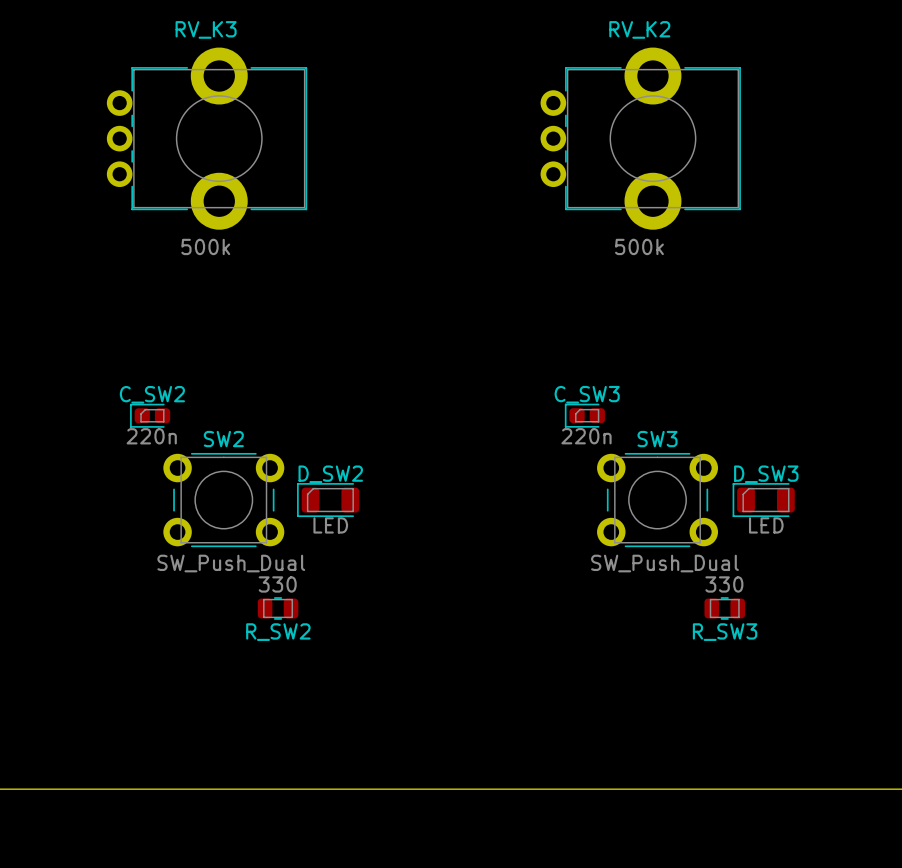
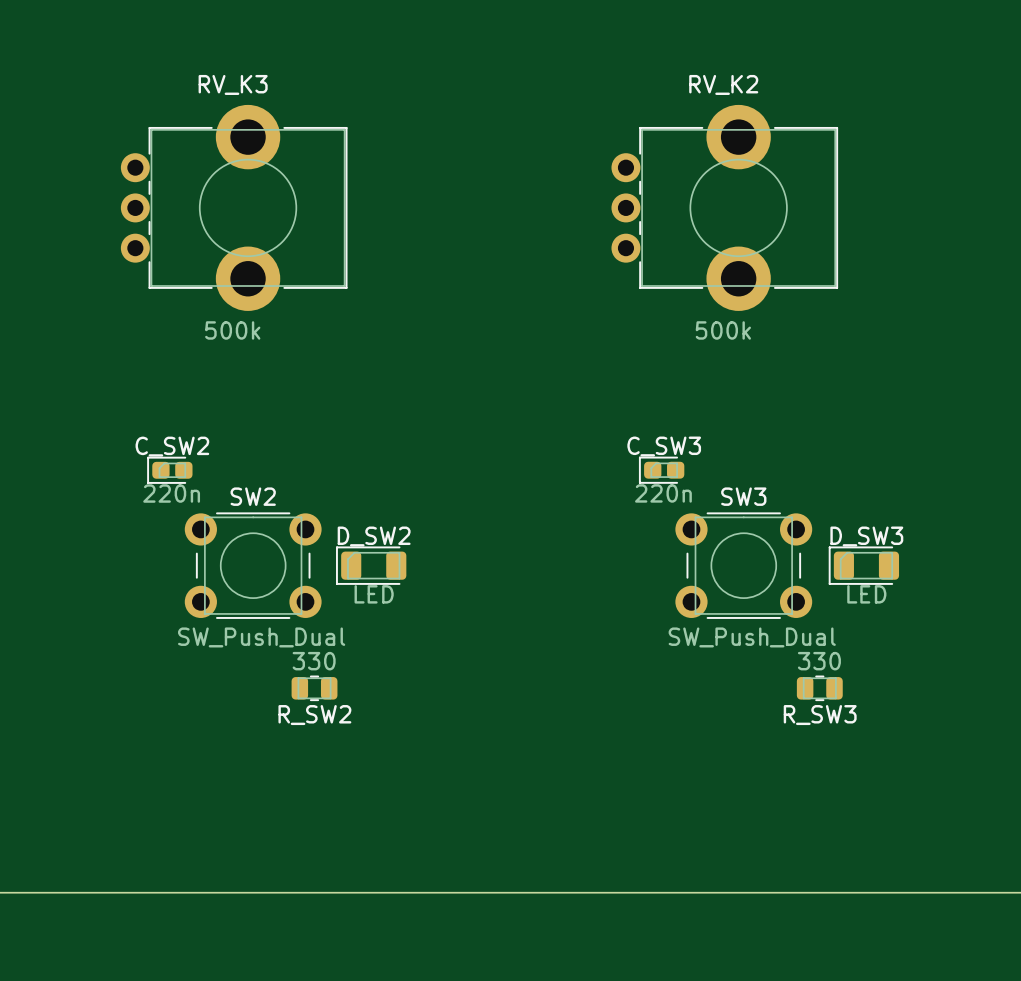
RV_K3 position: (207, 138) -> (234, 207)
RV_K2 position: (640, 138) -> (724, 207)

